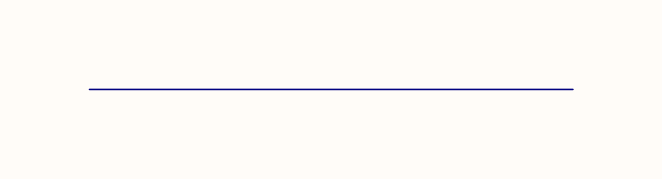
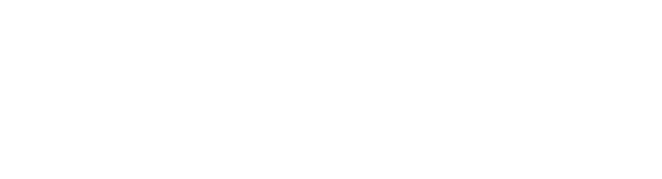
wire: (89, 89) (572, 89) -> none

